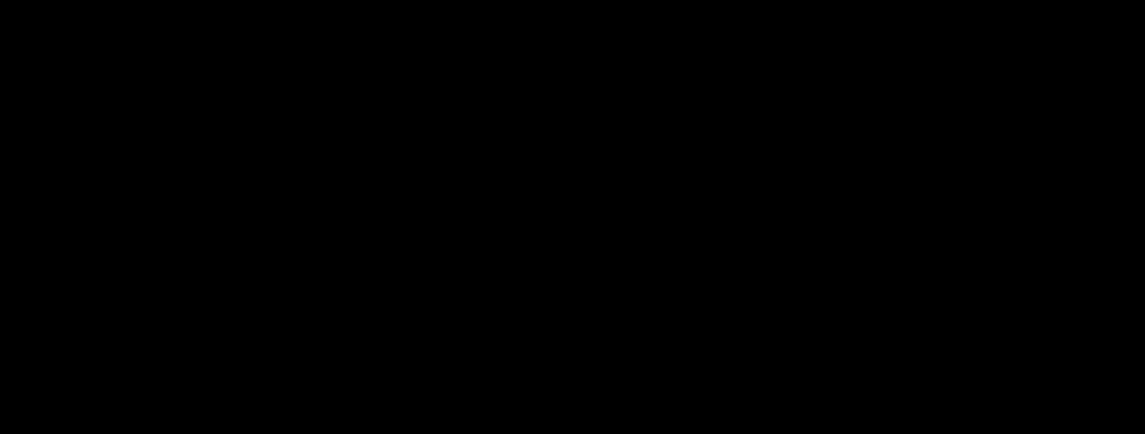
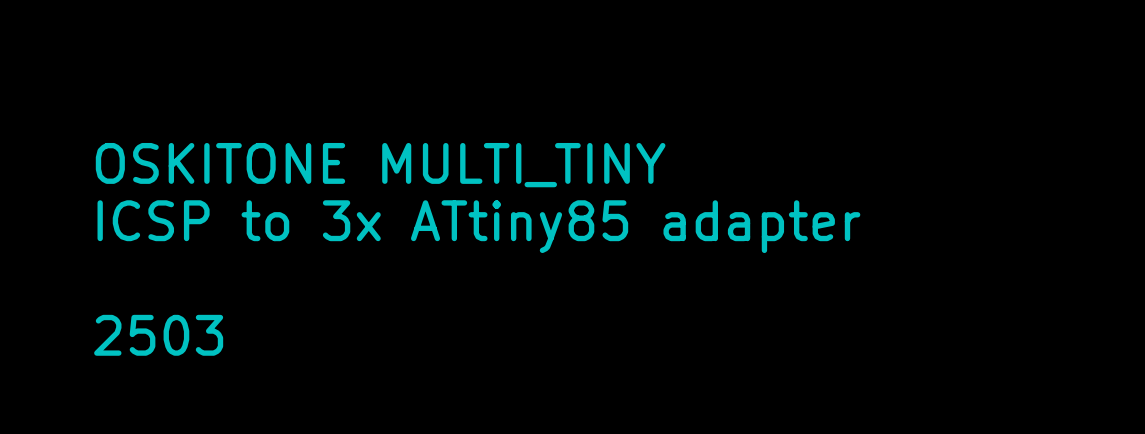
text: none -> OSKITONE MULTI_TINY (380, 165)
text: none -> ICSP to 3x ATtiny85 adapter (478, 226)
text: none -> 2503 (158, 335)

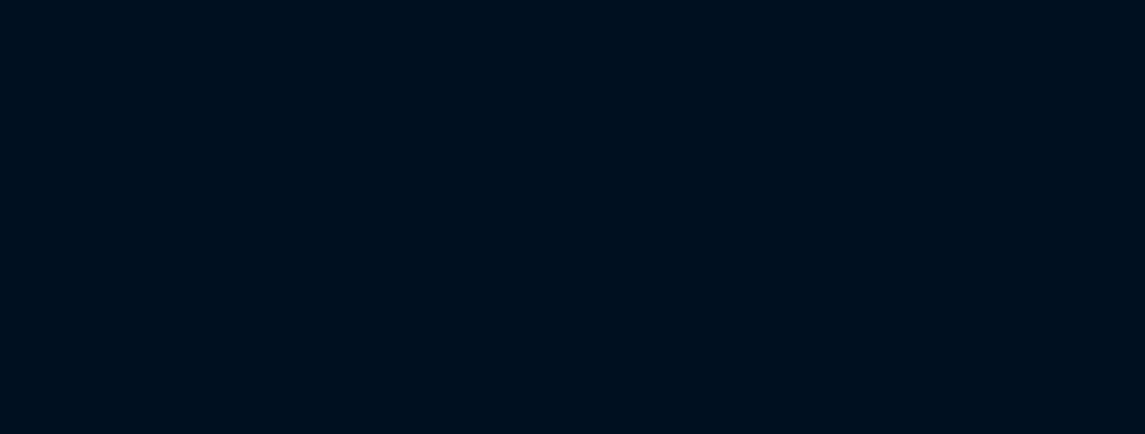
text: OSKITONE MULTI_TINY (380, 165) -> none
text: ICSP to 3x ATtiny85 adapter (478, 226) -> none
text: 2503 (158, 335) -> none

